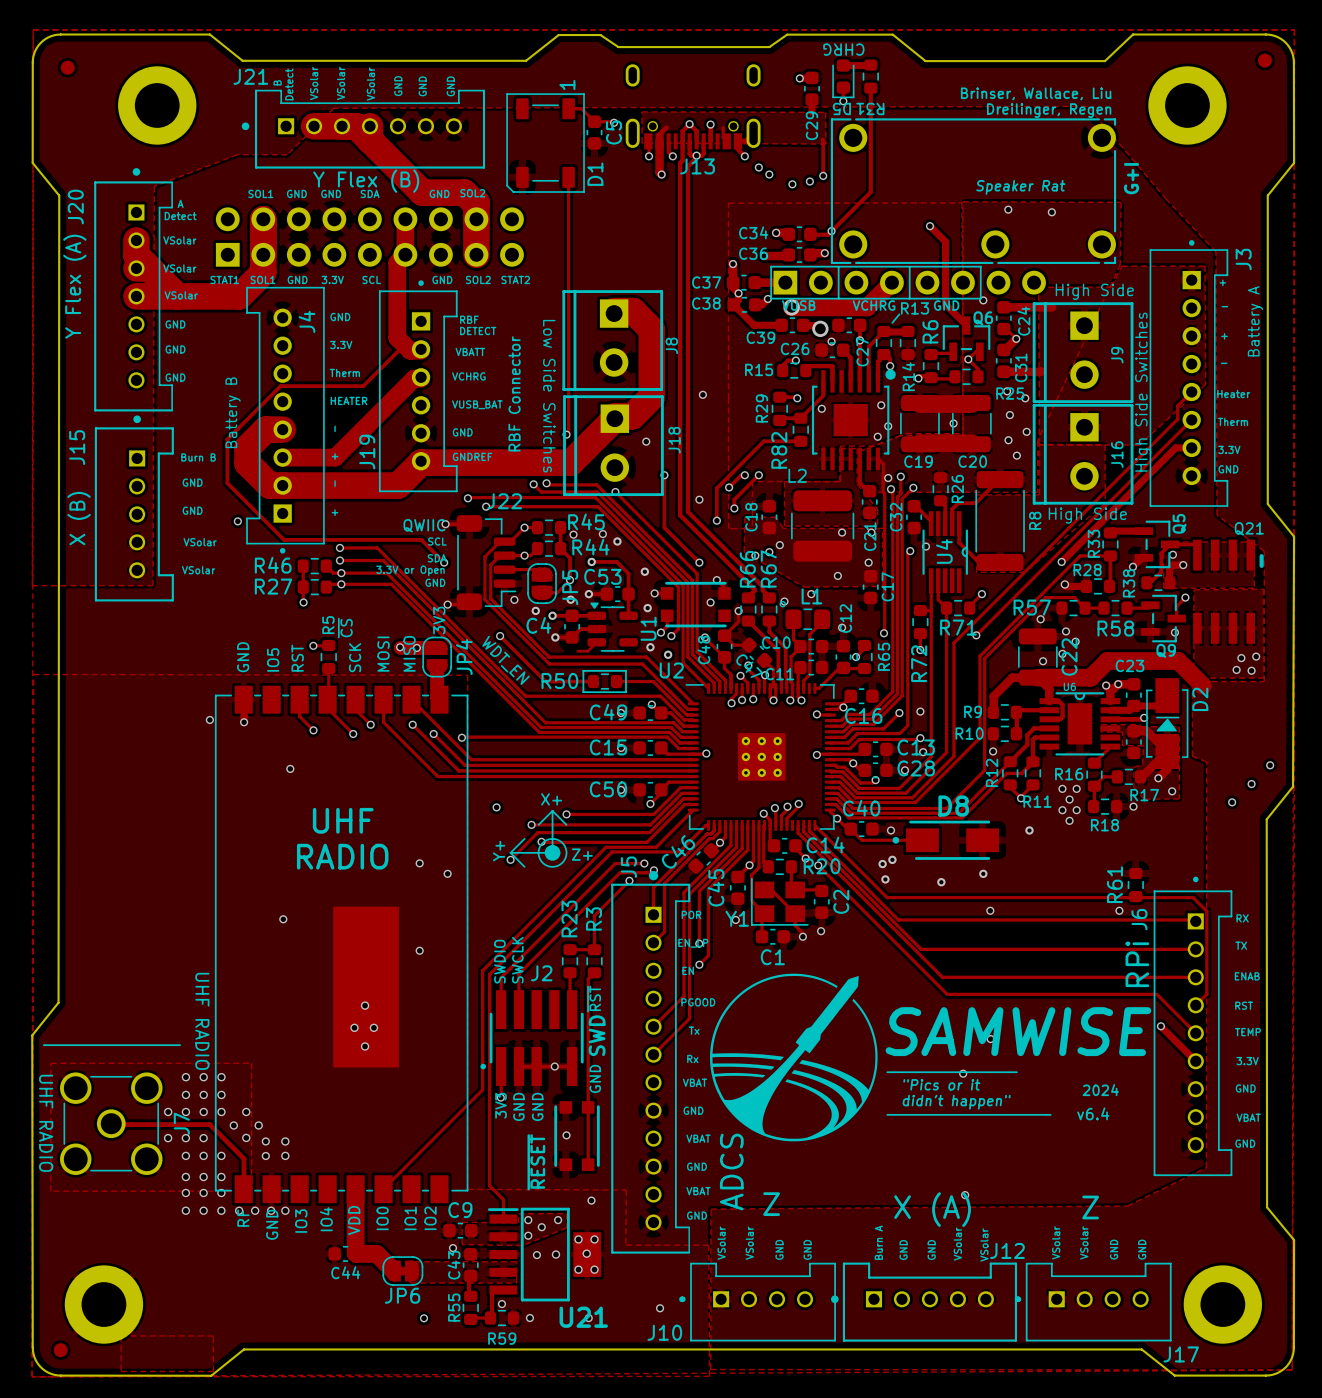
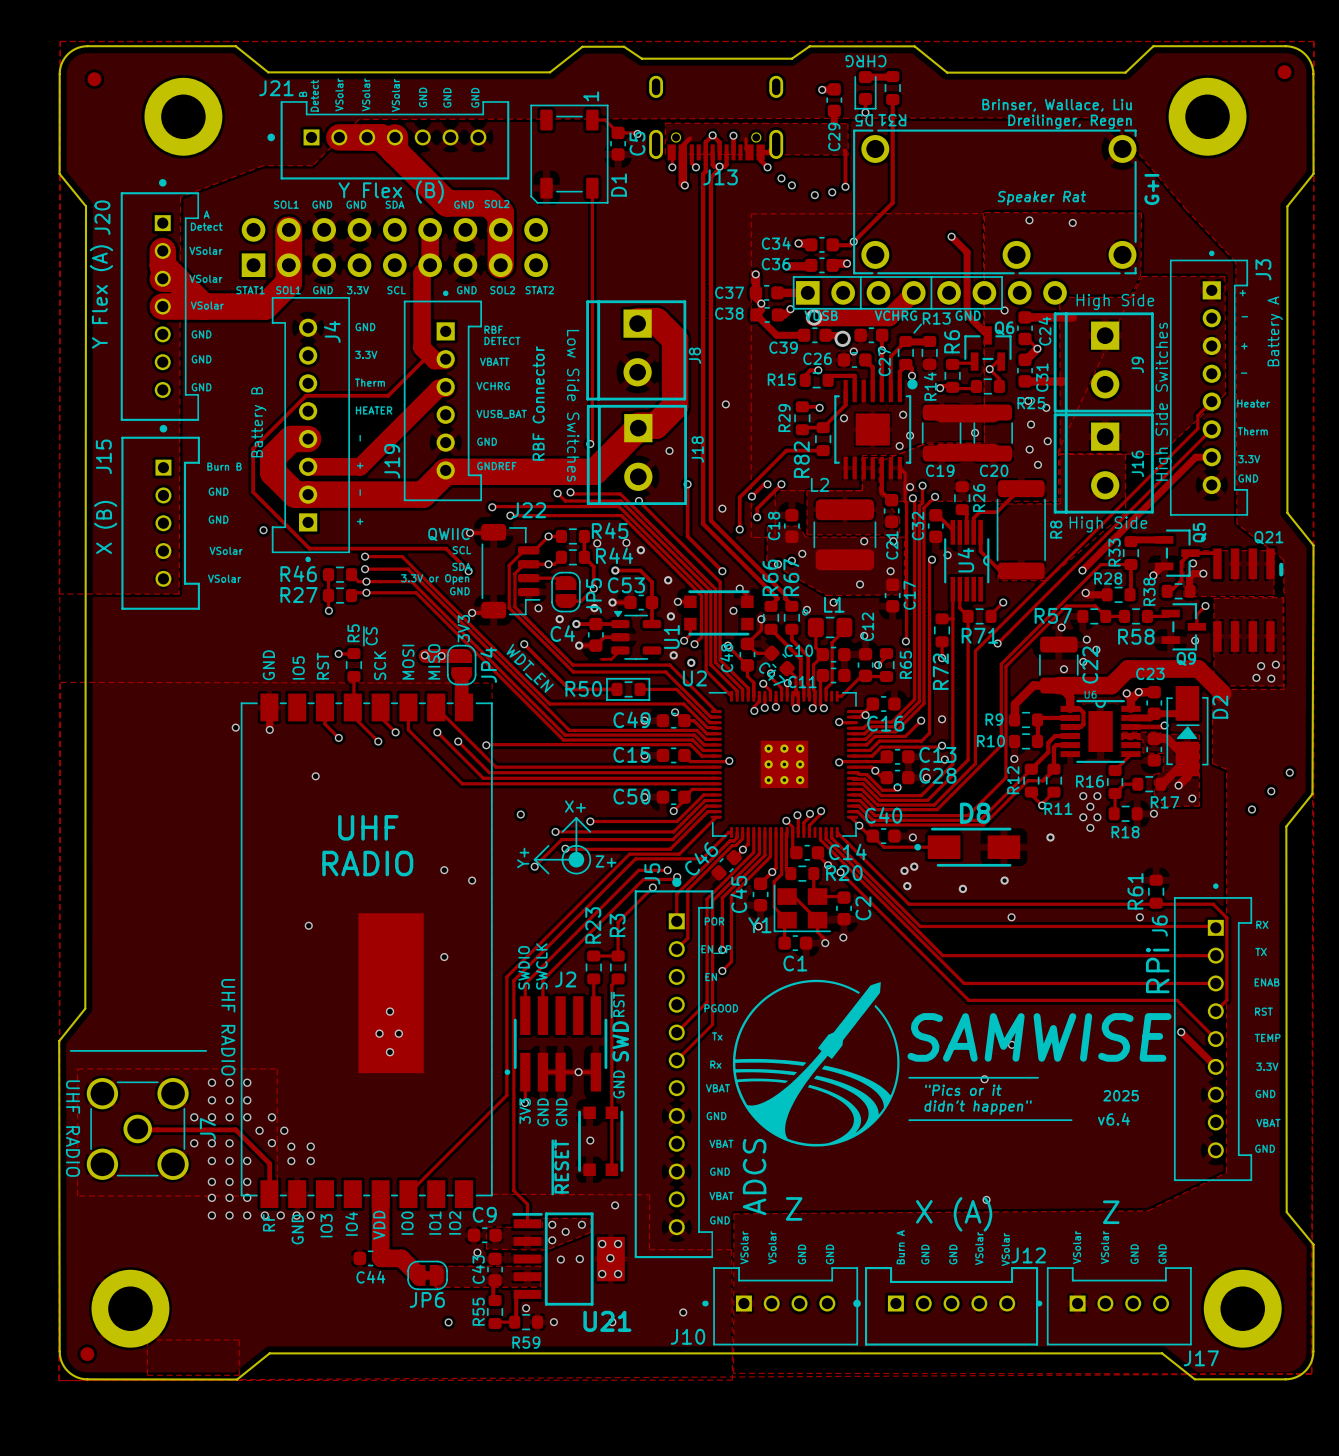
text: 2024 (1100, 1090) -> 2025 (1121, 1095)

